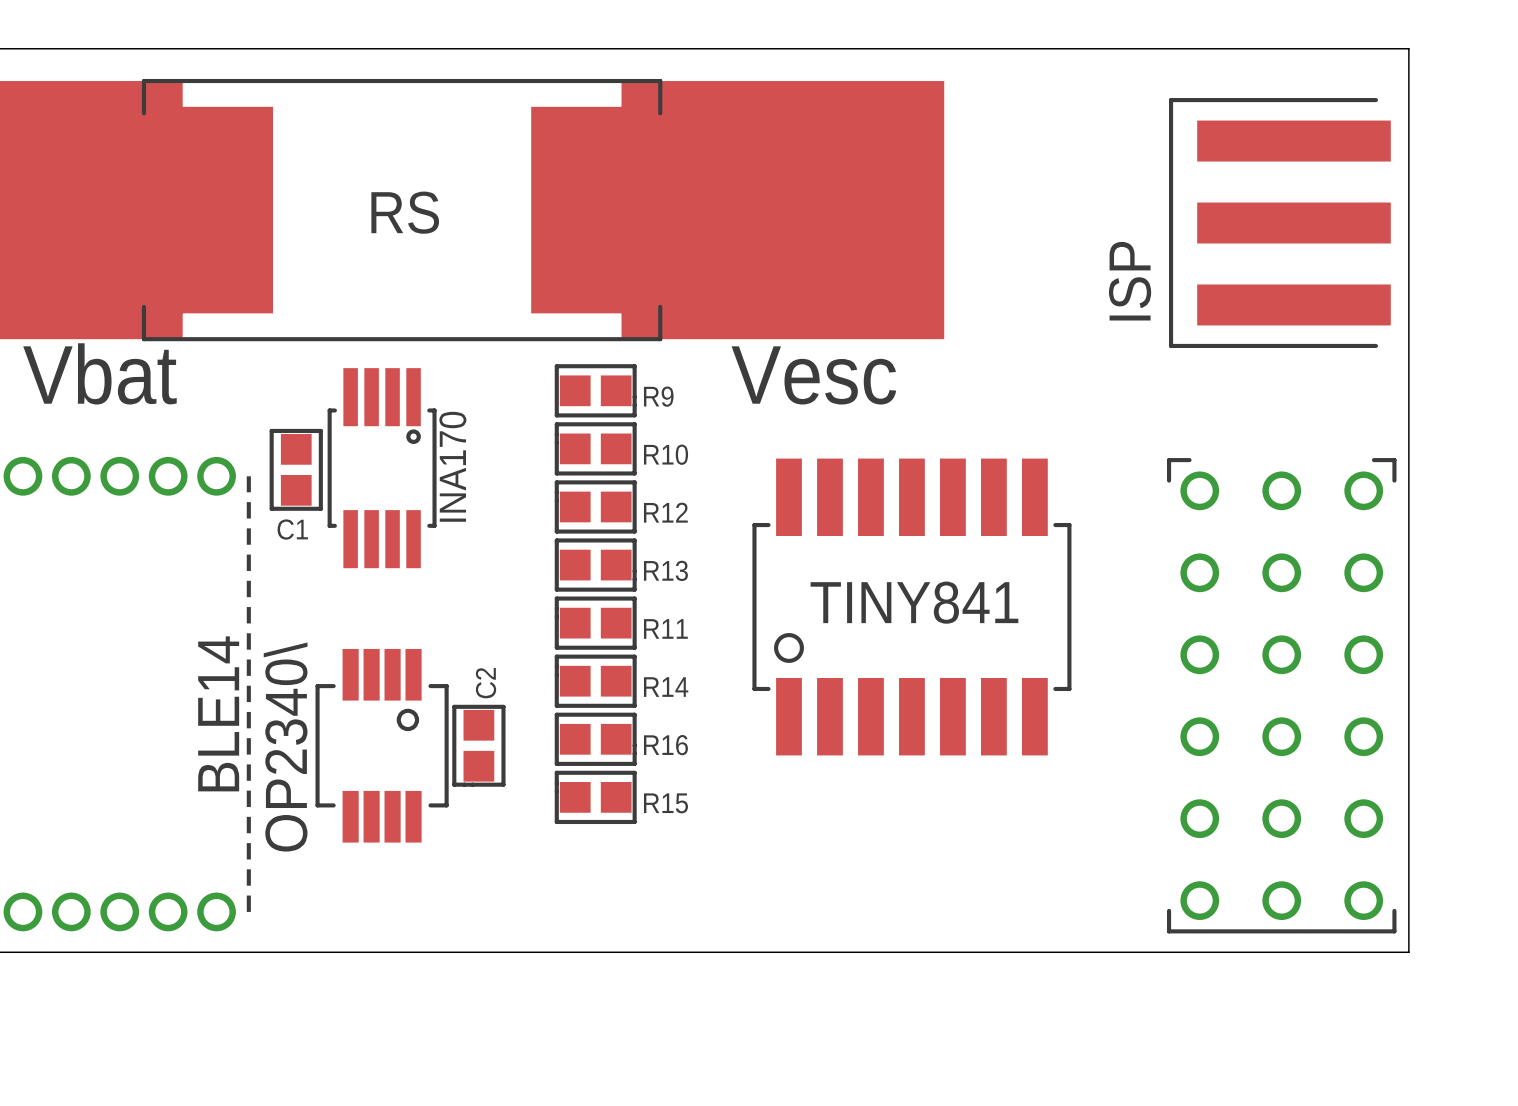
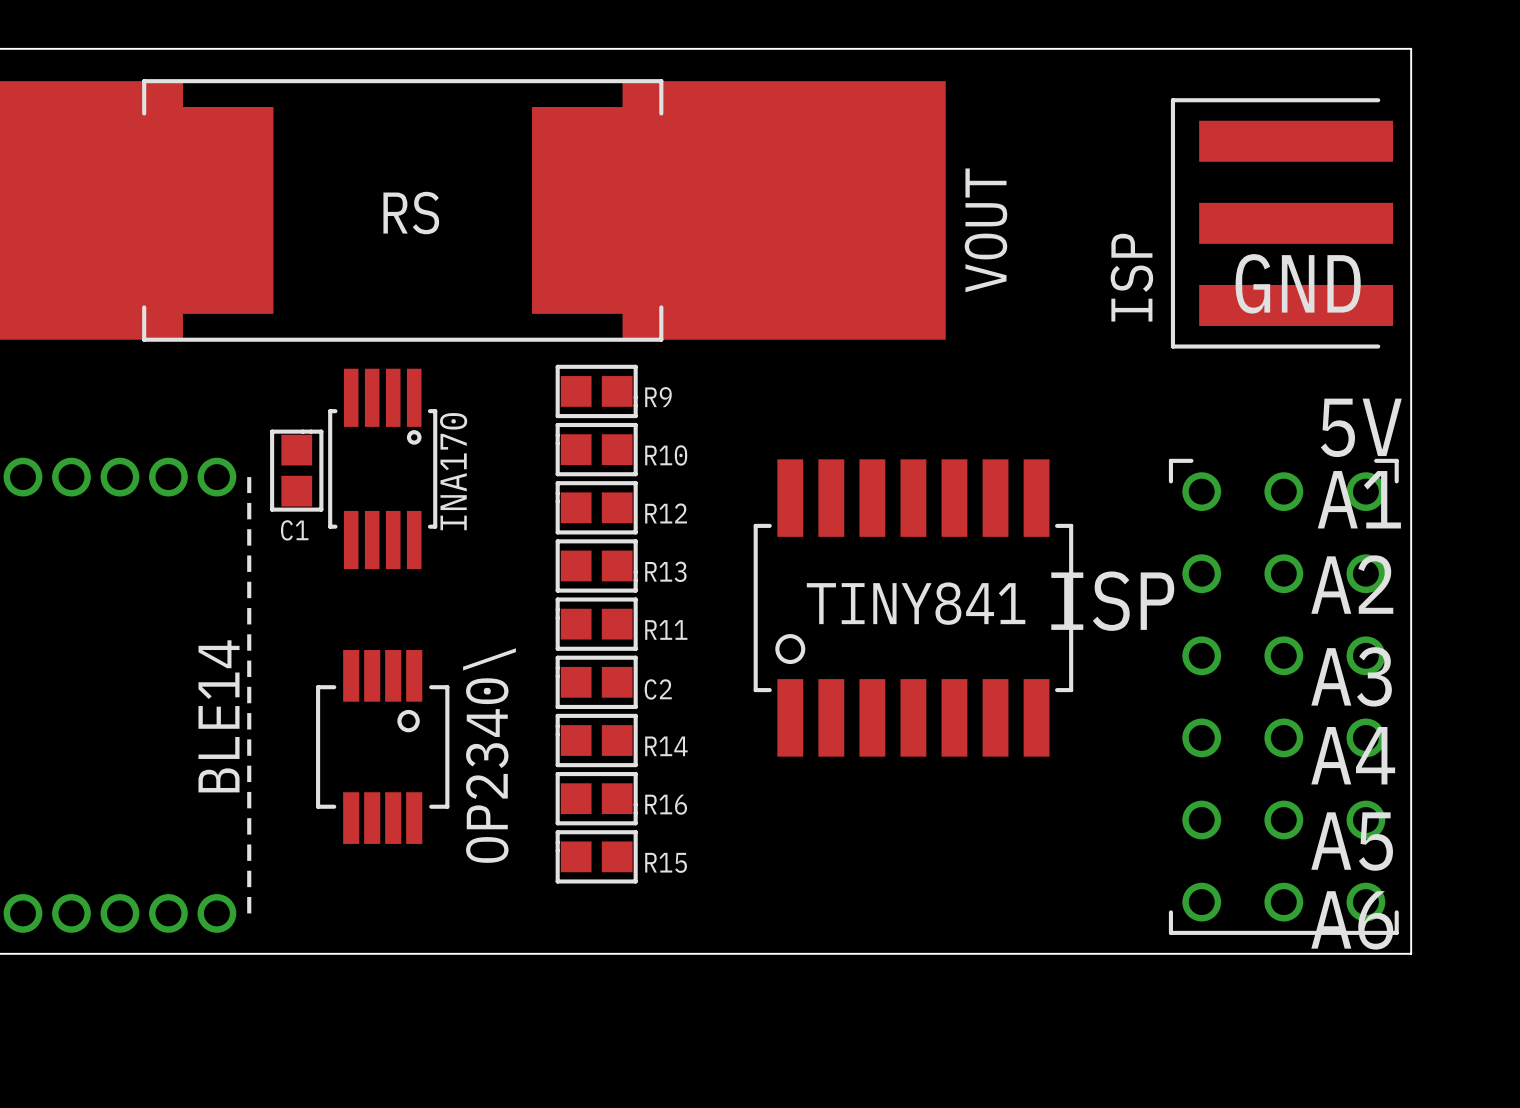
VOUT name: none -> VOUT (985, 230)
text: none -> GND (1298, 283)
text: Vbat (99, 373) -> none
text: Vesc (813, 375) -> none
text: none -> 5V (1361, 427)
text: none -> A1 (1359, 499)
text: none -> A2 (1352, 584)
text: none -> ISP (1112, 601)
text: none -> A3 (1351, 676)
R14 name: R14 (666, 687) -> C2 (658, 689)
R16 position: (595, 739) -> (596, 798)
R14: none -> (596, 740)
C2: (478, 745) -> none
OP2340\ name position: OP2340\ (285, 747) -> OP2340\ (489, 755)
text: none -> A4 (1353, 755)
R15 position: (595, 797) -> (596, 856)
text: none -> A5 (1352, 841)
text: none -> A6 (1352, 920)

